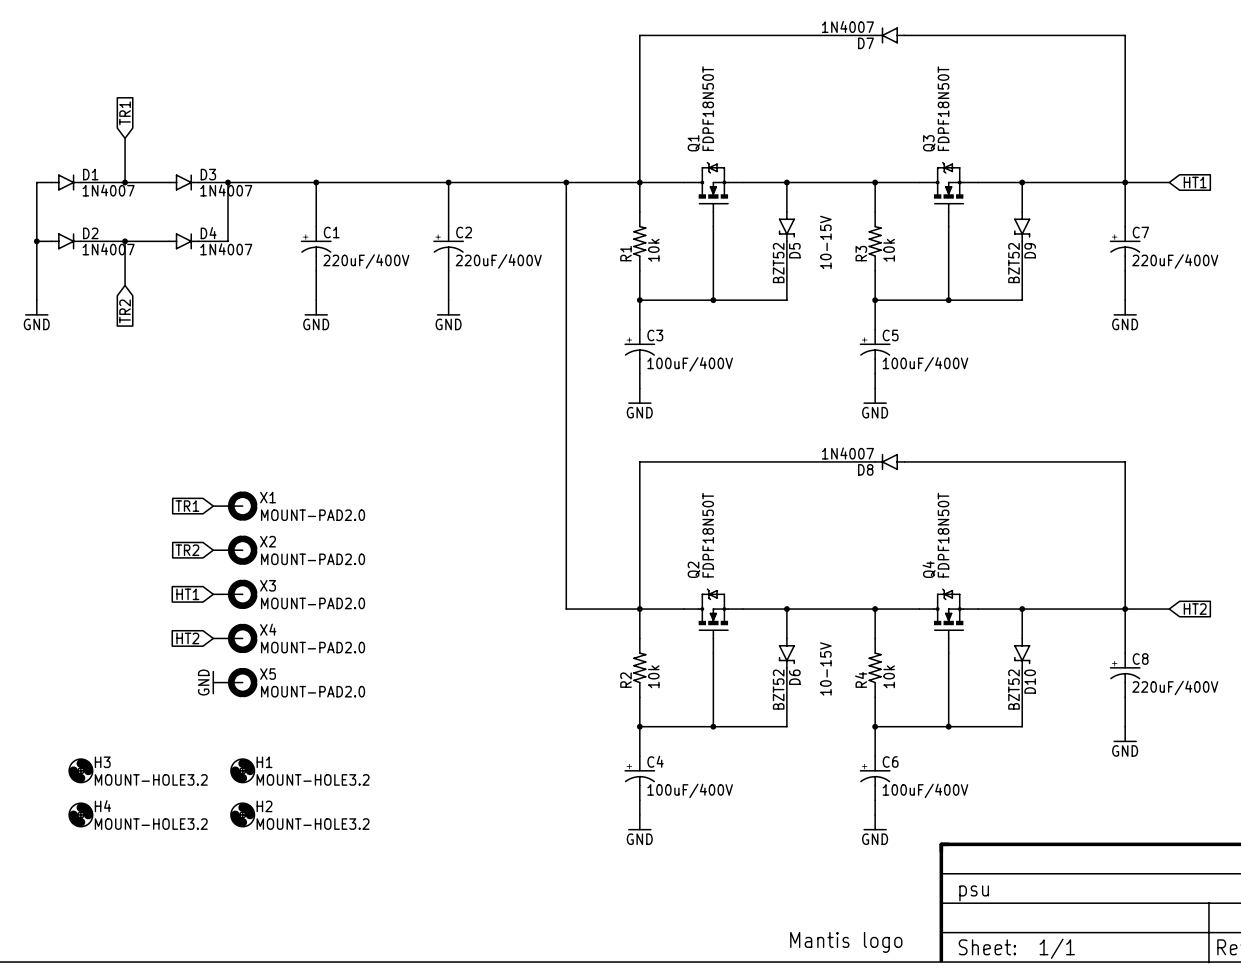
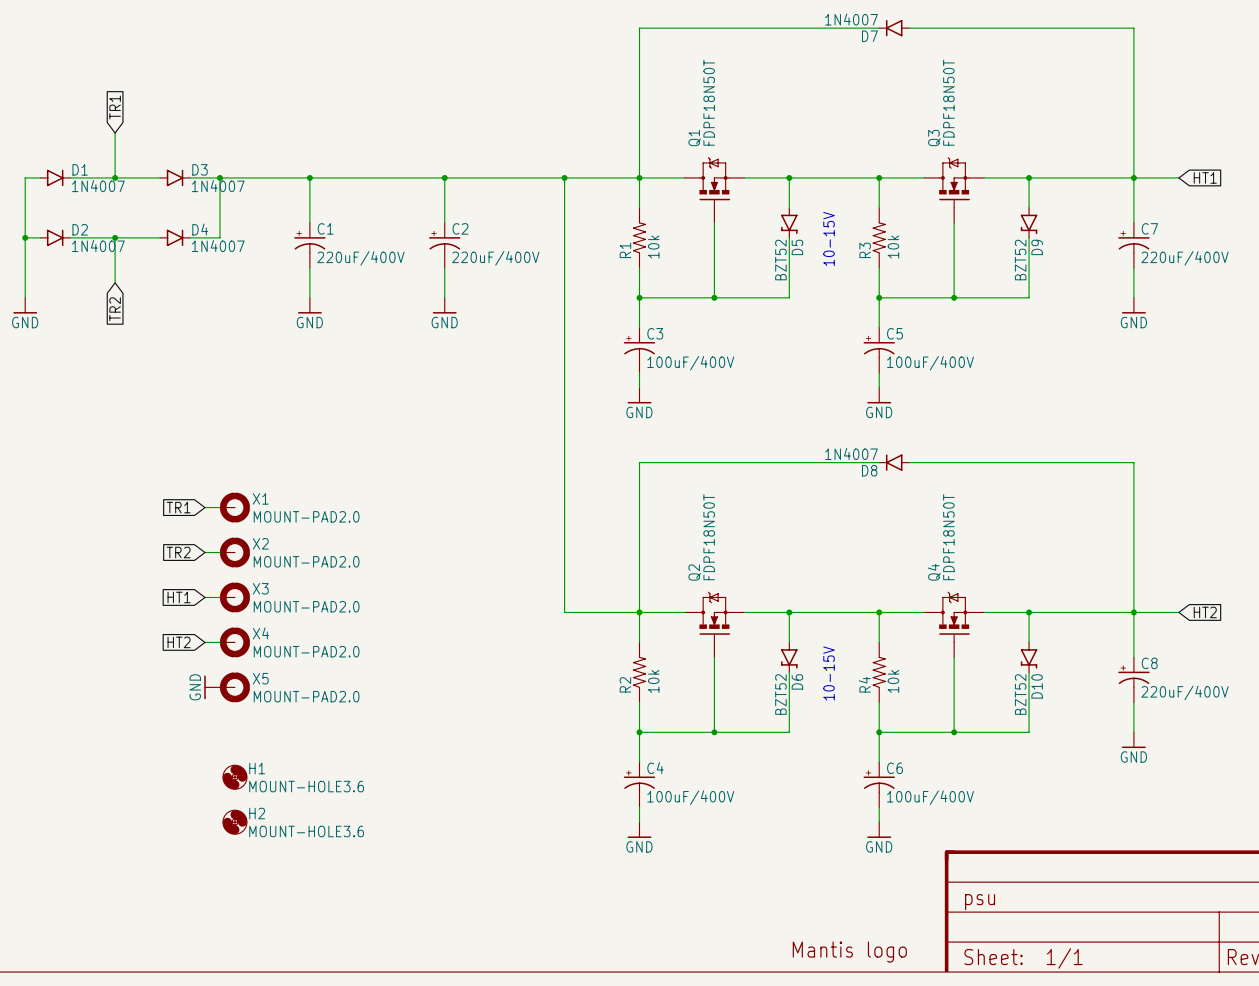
H3: MOUNT-HOLE3.2 (80, 770) -> none
H1 value: MOUNT-HOLE3.2 (313, 779) -> MOUNT-HOLE3.6 (306, 786)
H4: MOUNT-HOLE3.2 (80, 814) -> none
H2 value: MOUNT-HOLE3.2 (313, 824) -> MOUNT-HOLE3.6 (306, 831)

